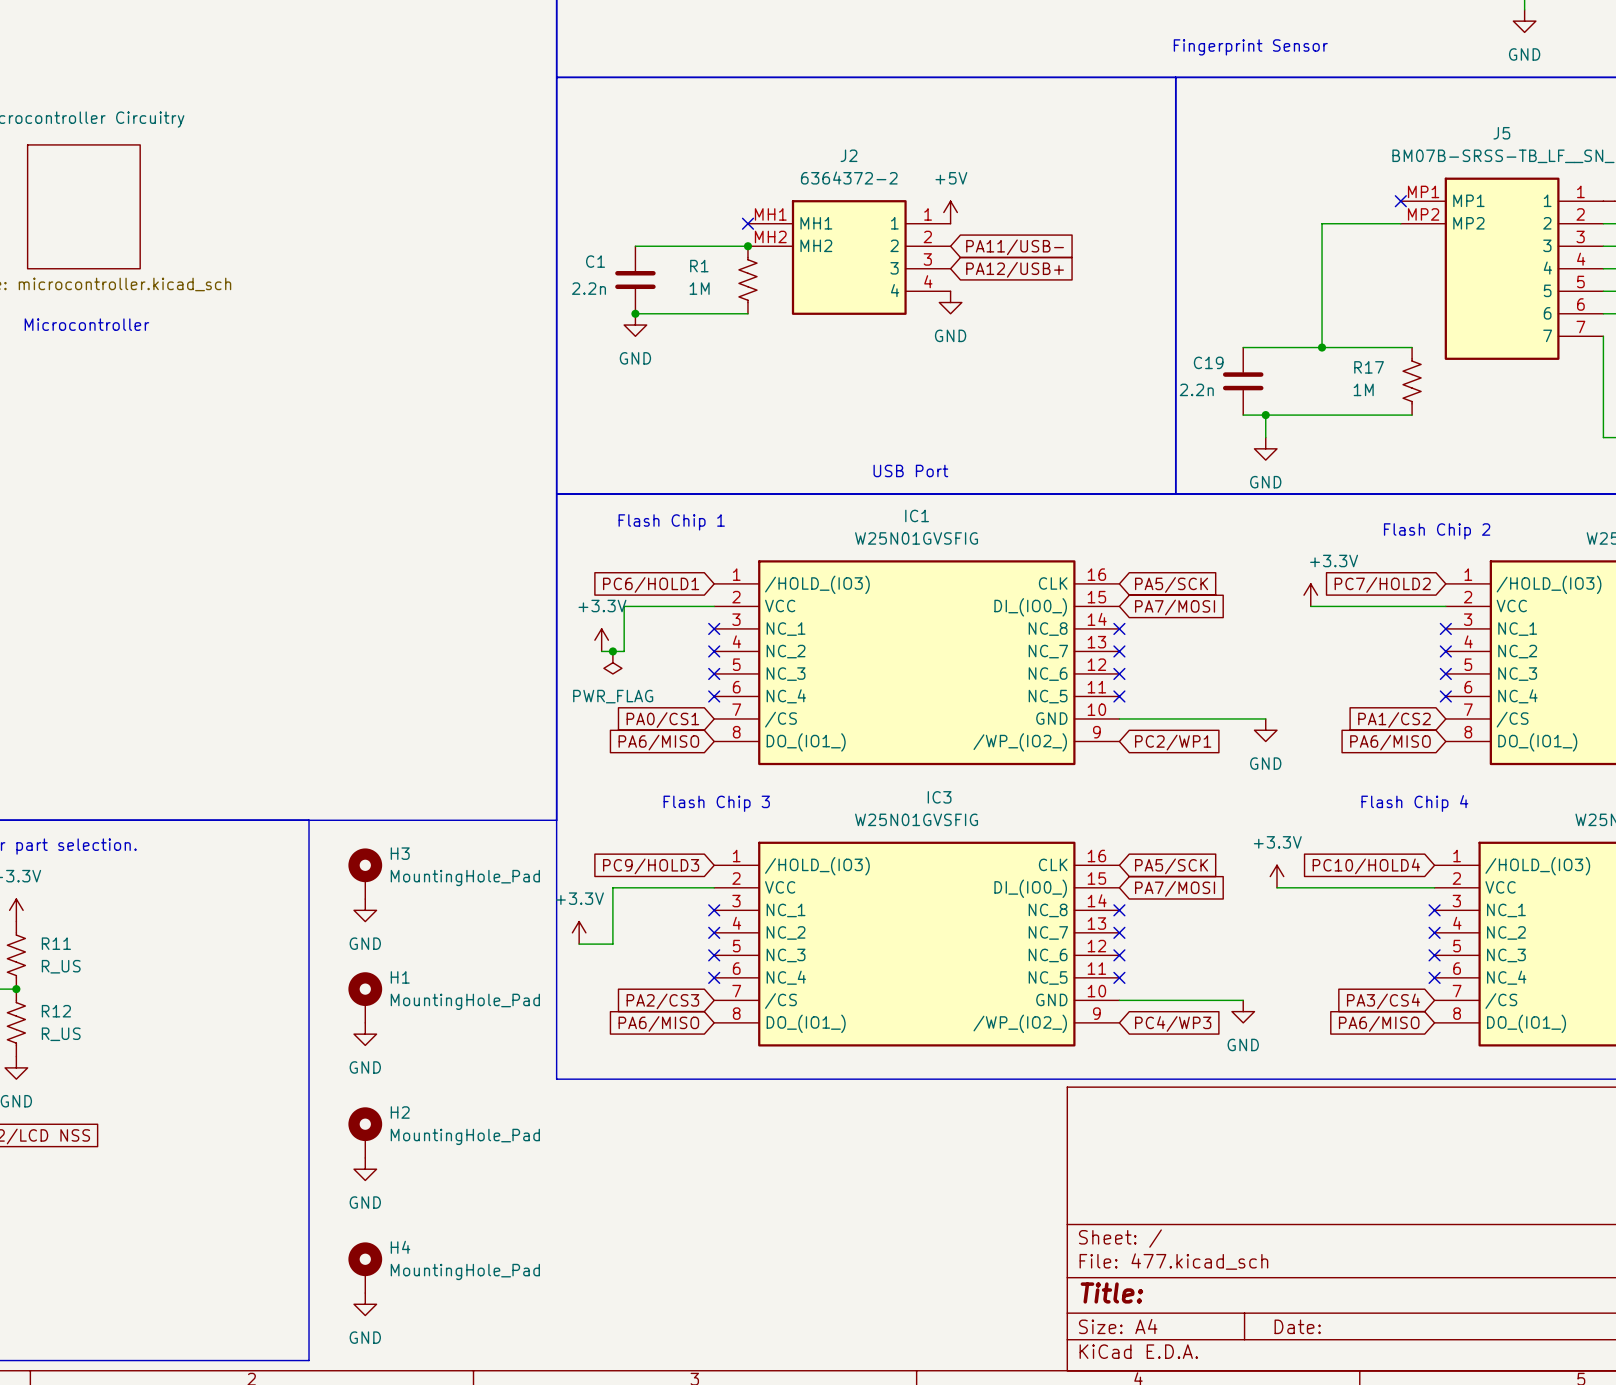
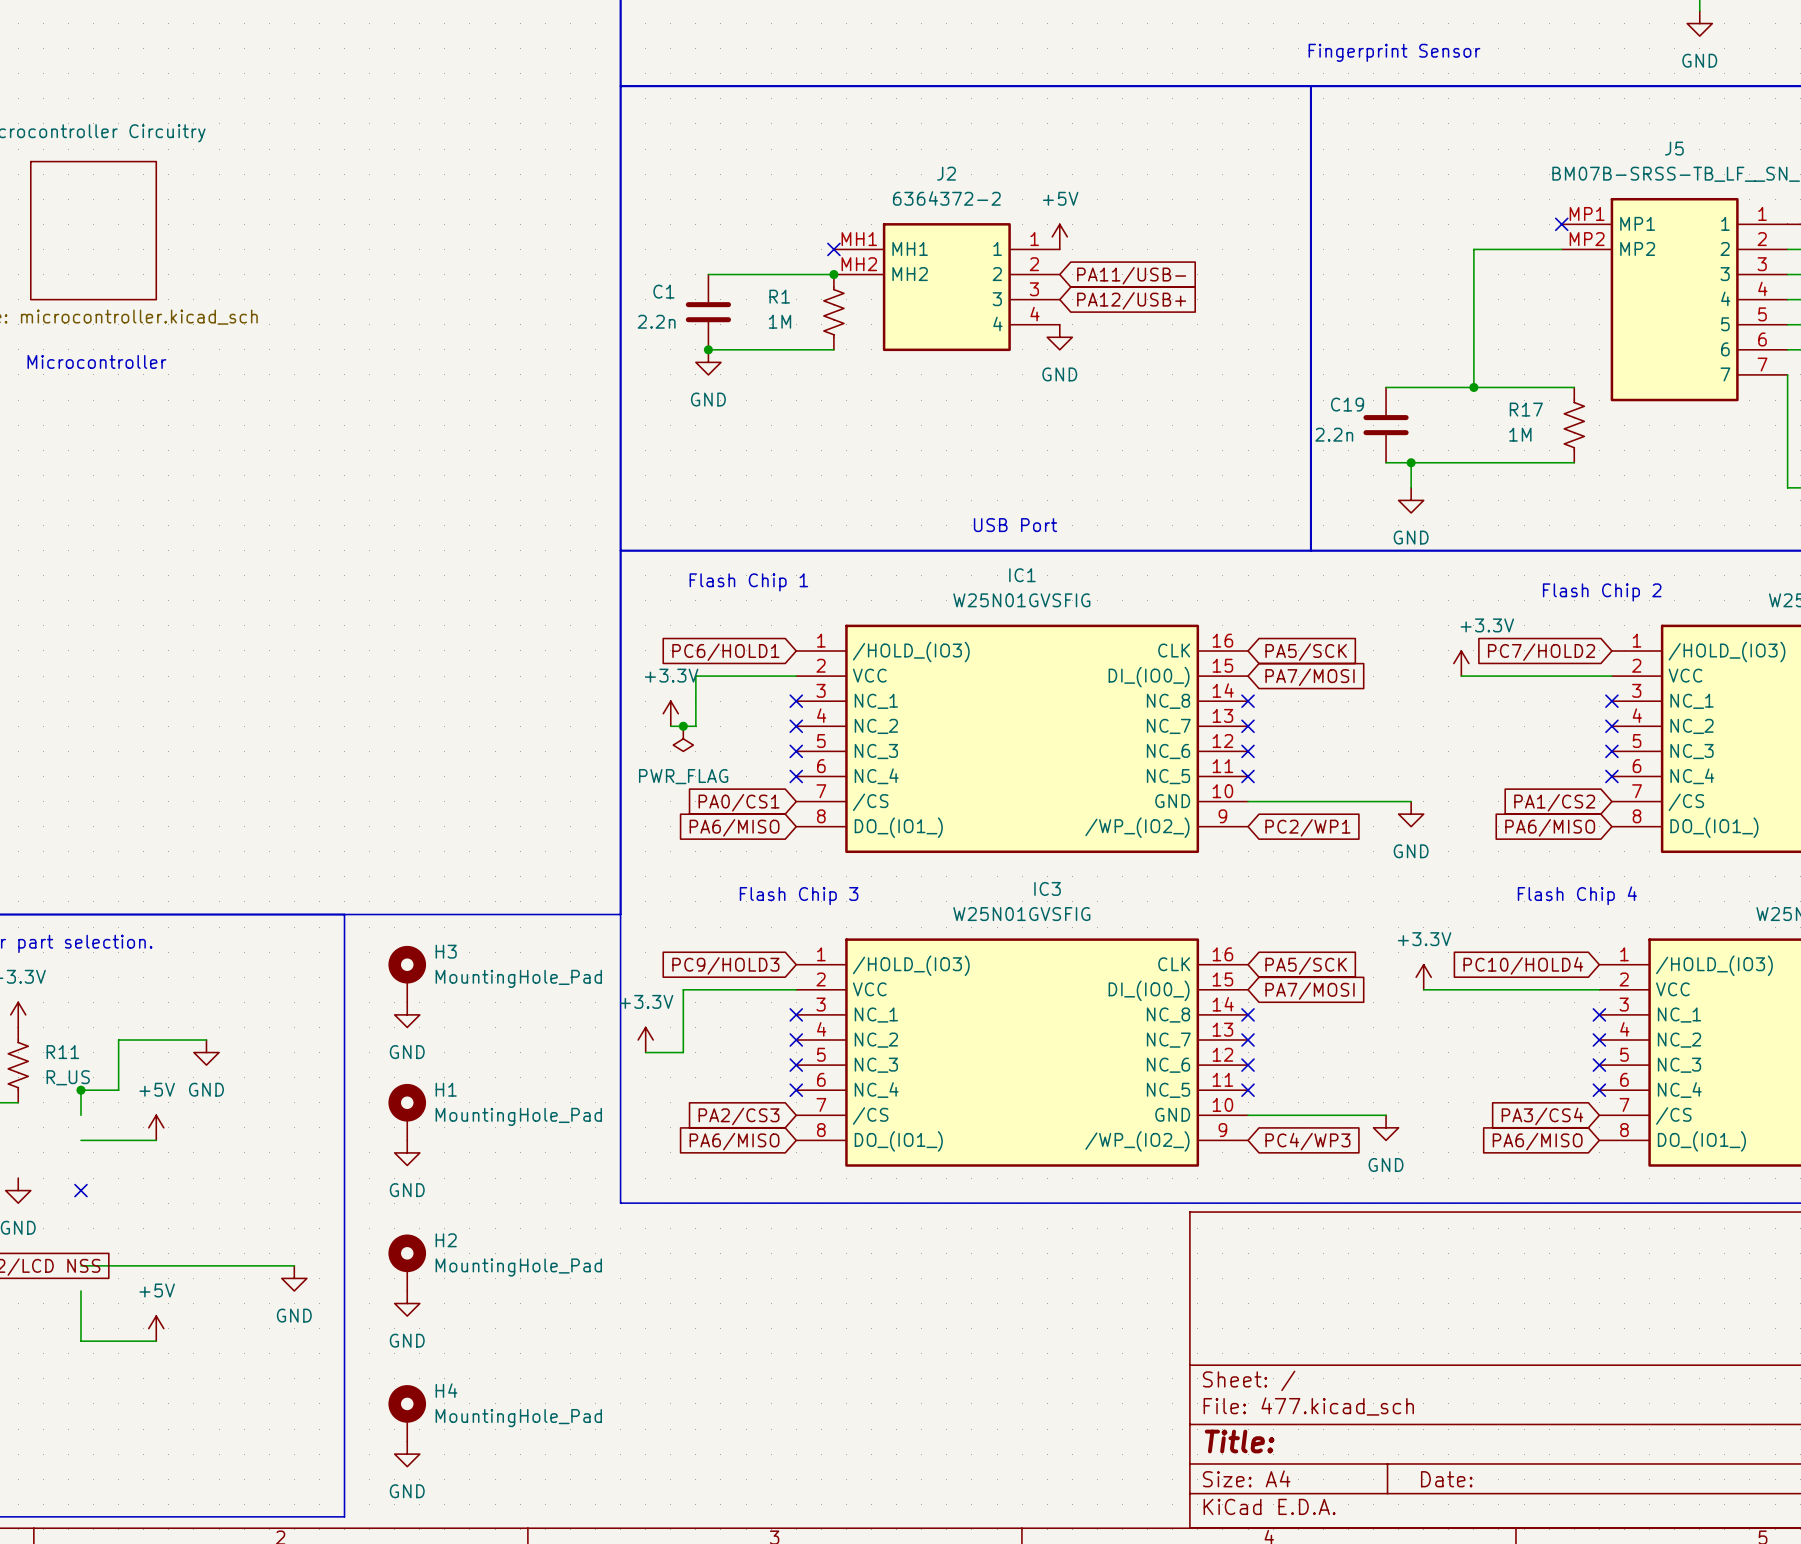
wire: none -> (206, 1040) (118, 1040) (118, 1090) (80, 1090) (80, 1115)
power symbol: none -> GND (206, 1052)
junction: none -> (80, 1090)
junction: (16, 989) -> none
power symbol: none -> +5V (156, 1127)
R12: R_US (16, 1022) -> none
wire: none -> (80, 1140) (156, 1140)
no-connect mark: none -> (80, 1190)
wire: none -> (80, 1265) (294, 1265)
power symbol: none -> GND (294, 1278)
wire: none -> (80, 1290) (80, 1341) (156, 1341)
power symbol: none -> +5V (156, 1328)

